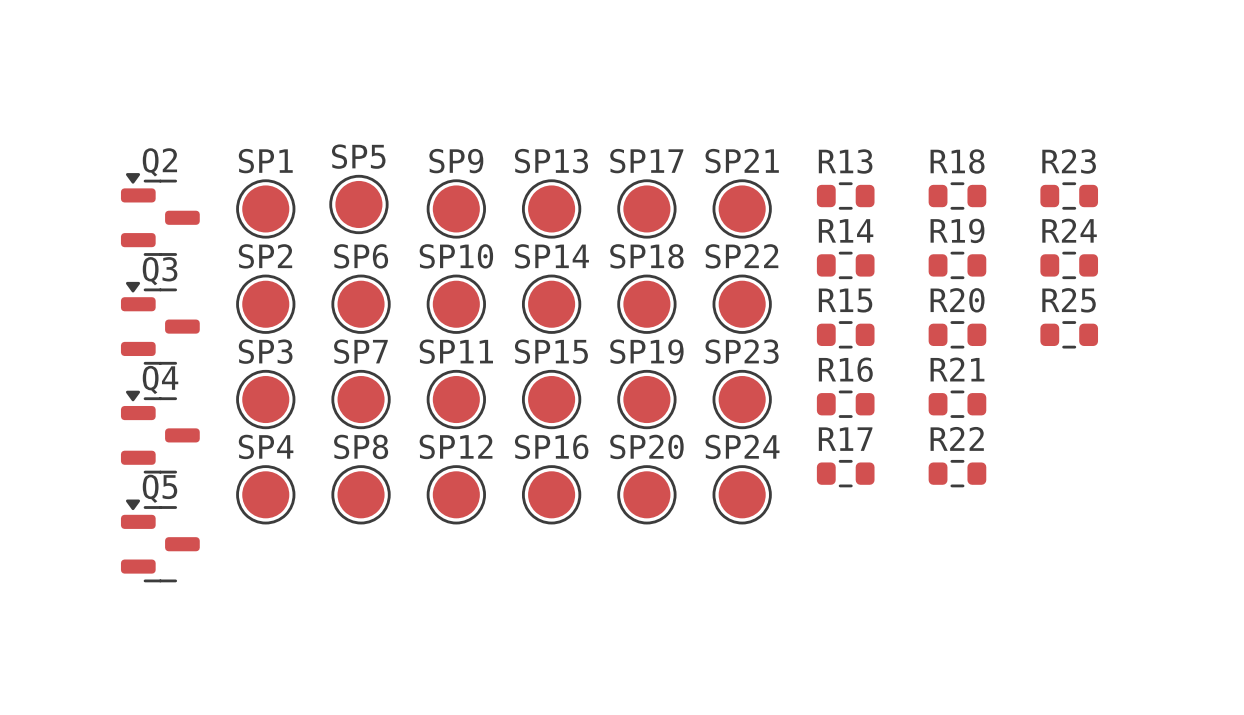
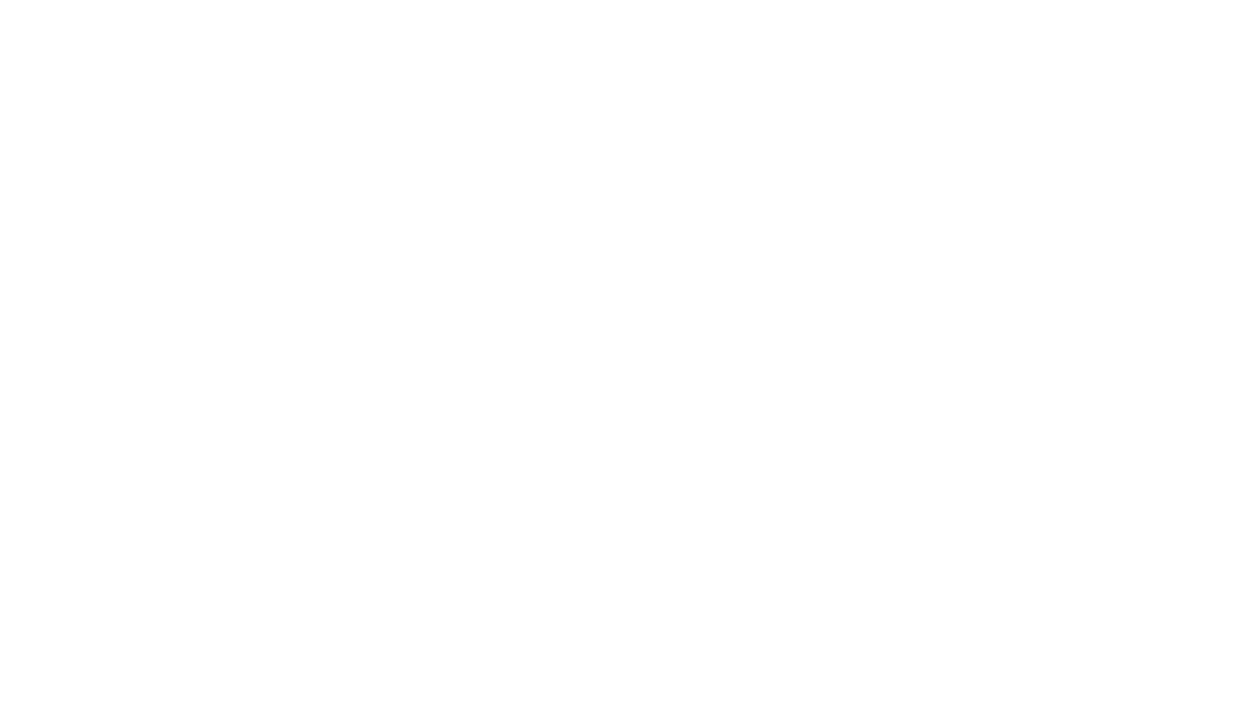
R13: (845, 196) -> none
R18: (957, 196) -> none
R23: (1069, 196) -> none
SP5: (358, 204) -> none
SP1: (265, 208) -> none
SP9: (456, 208) -> none
SP13: (551, 208) -> none
SP17: (646, 208) -> none
SP21: (742, 208) -> none
Q2: (160, 214) -> none
R14: (845, 265) -> none
R19: (957, 265) -> none
R24: (1069, 265) -> none
SP2: (265, 304) -> none
SP6: (361, 304) -> none
SP10: (456, 304) -> none
SP14: (551, 304) -> none
SP18: (646, 304) -> none
SP22: (742, 304) -> none
Q3: (160, 323) -> none
R15: (845, 334) -> none
R20: (957, 334) -> none
R25: (1069, 334) -> none
SP3: (265, 399) -> none
SP7: (361, 399) -> none
SP11: (456, 399) -> none
SP15: (551, 399) -> none
SP19: (646, 399) -> none
SP23: (742, 399) -> none
R16: (845, 404) -> none
R21: (957, 404) -> none
Q4: (160, 432) -> none
R17: (845, 473) -> none
R22: (957, 473) -> none
SP4: (265, 494) -> none
SP8: (361, 494) -> none
SP12: (456, 494) -> none
SP16: (551, 494) -> none
SP20: (646, 494) -> none
SP24: (742, 494) -> none
Q5: (160, 540) -> none

